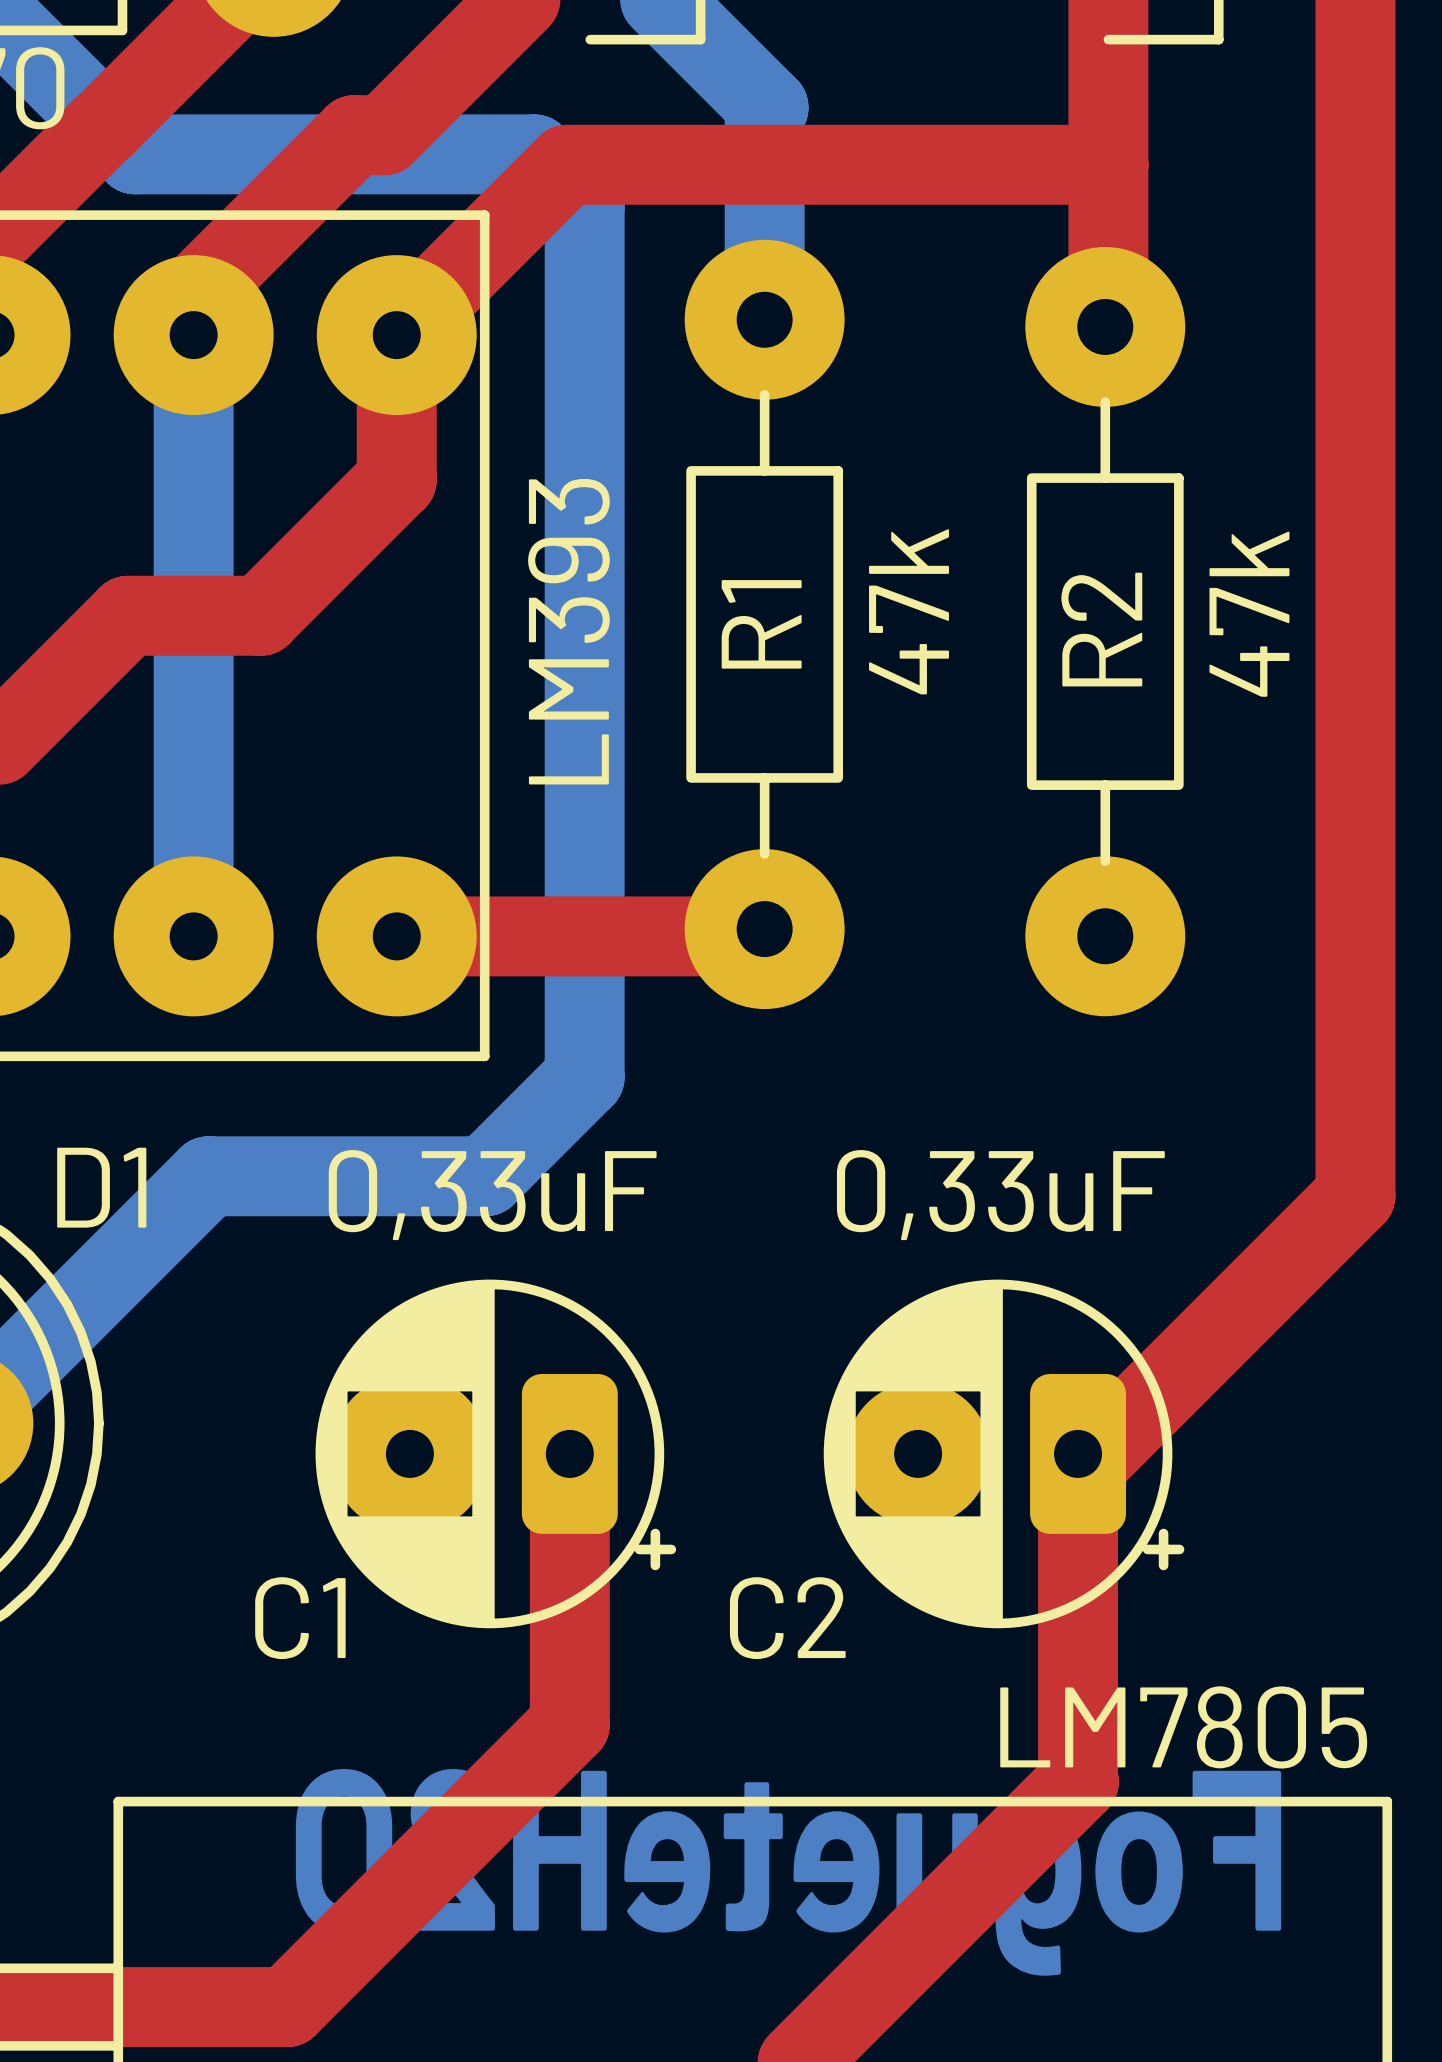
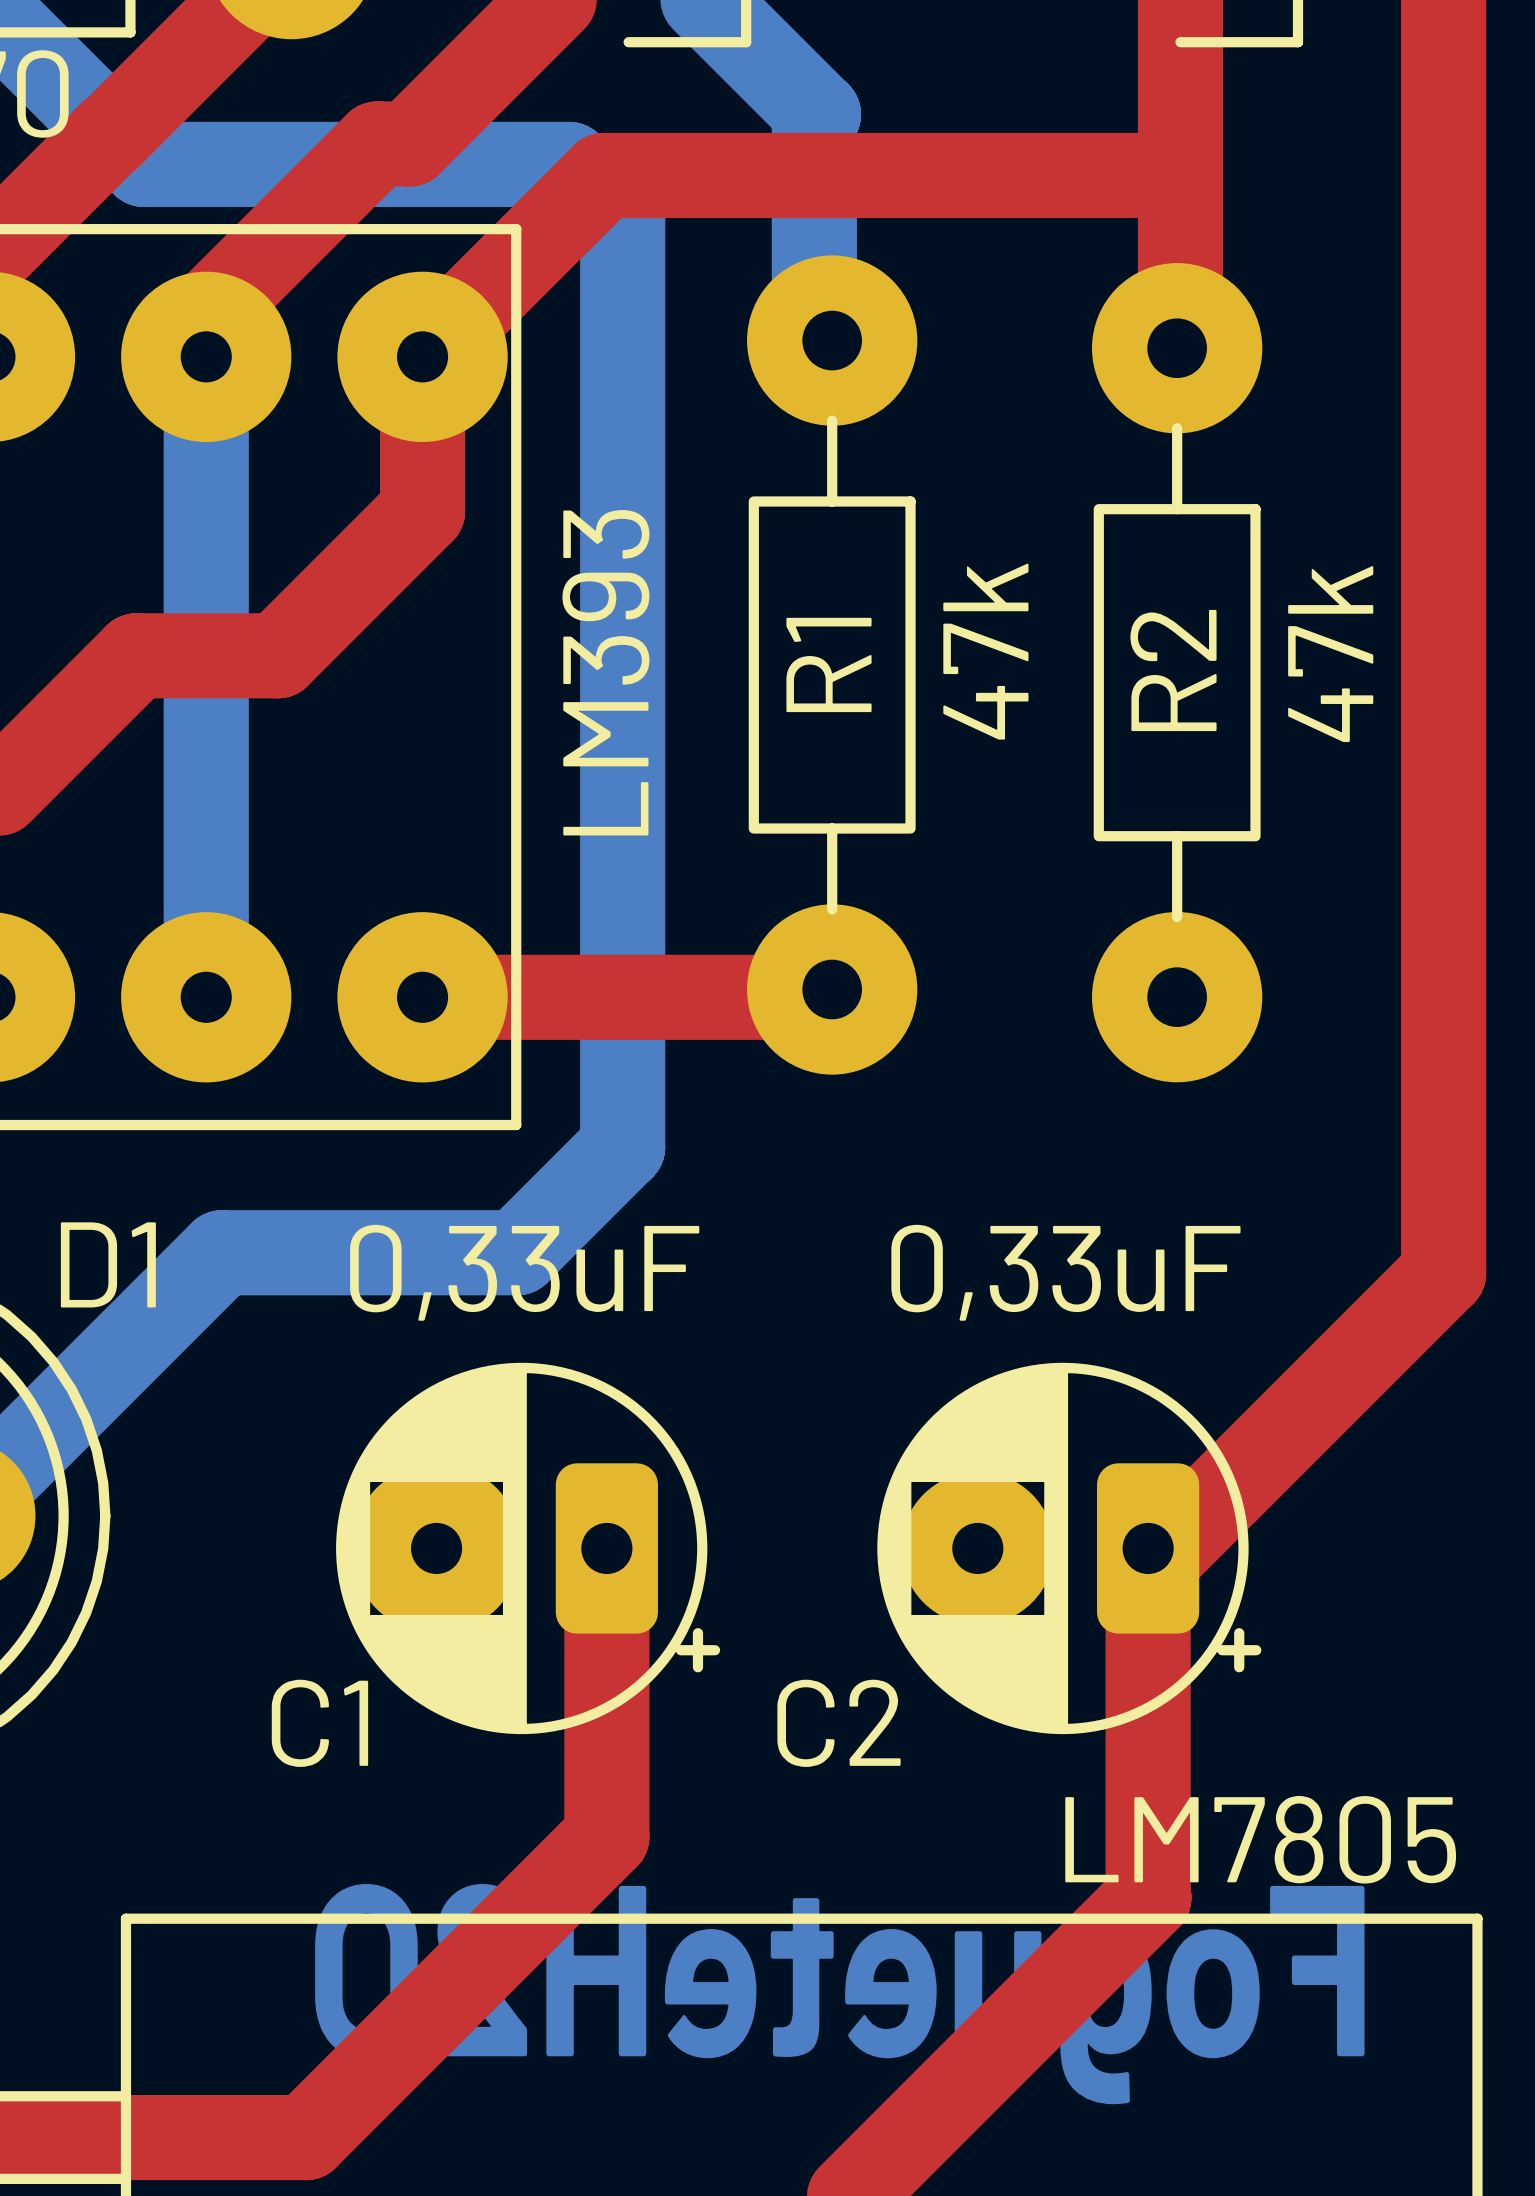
R1 position: (764, 624) -> (832, 665)

